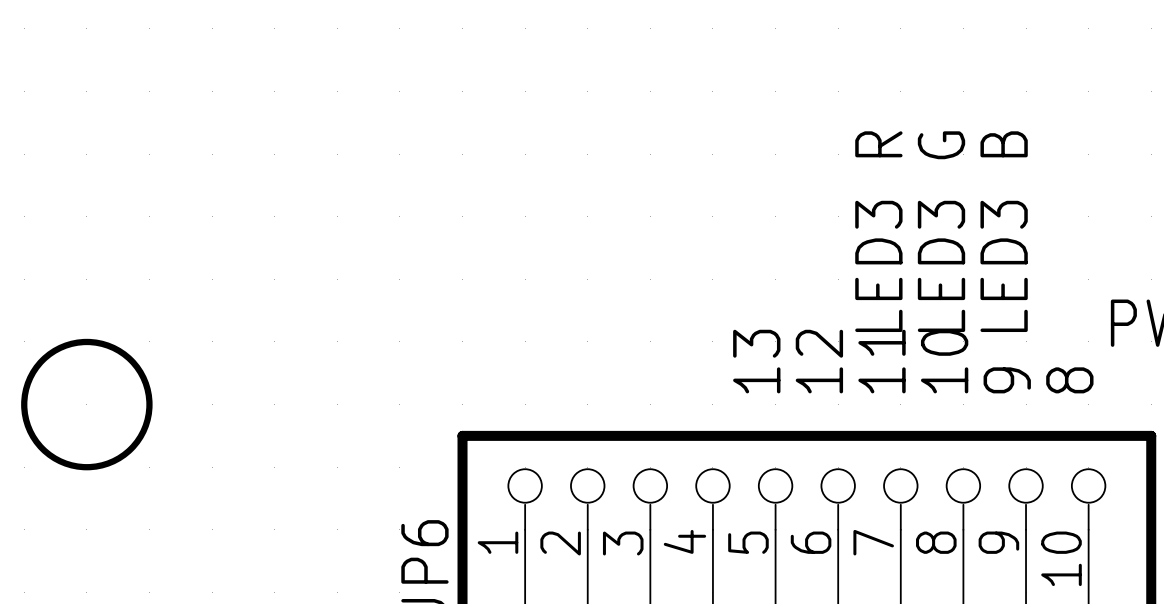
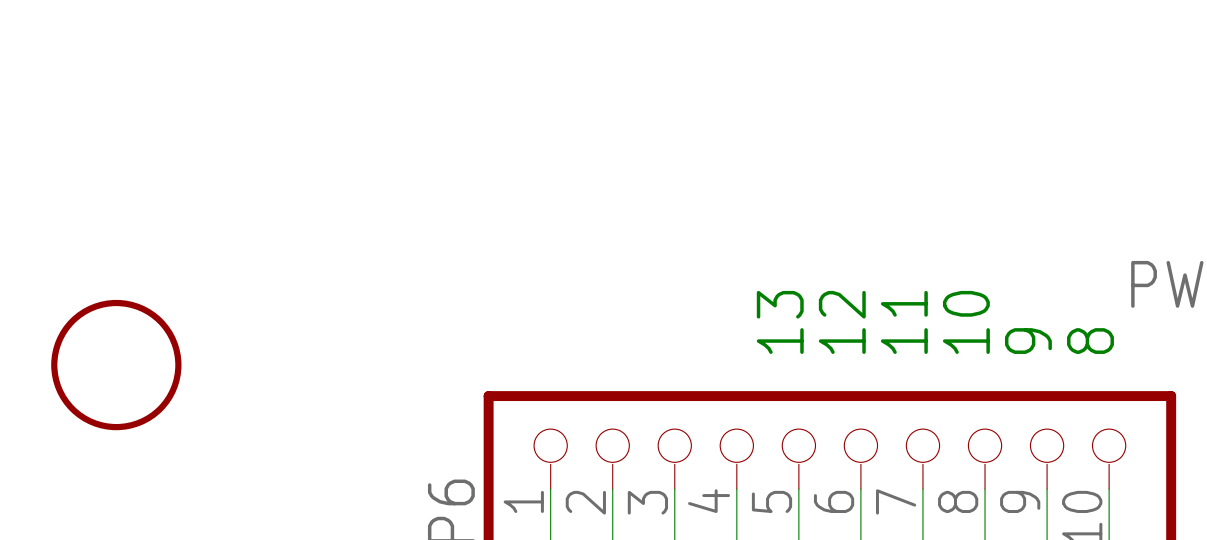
text: LED3 R (878, 231) -> none
text: LED3 G (941, 231) -> none
text: LED3 B (1004, 231) -> none

